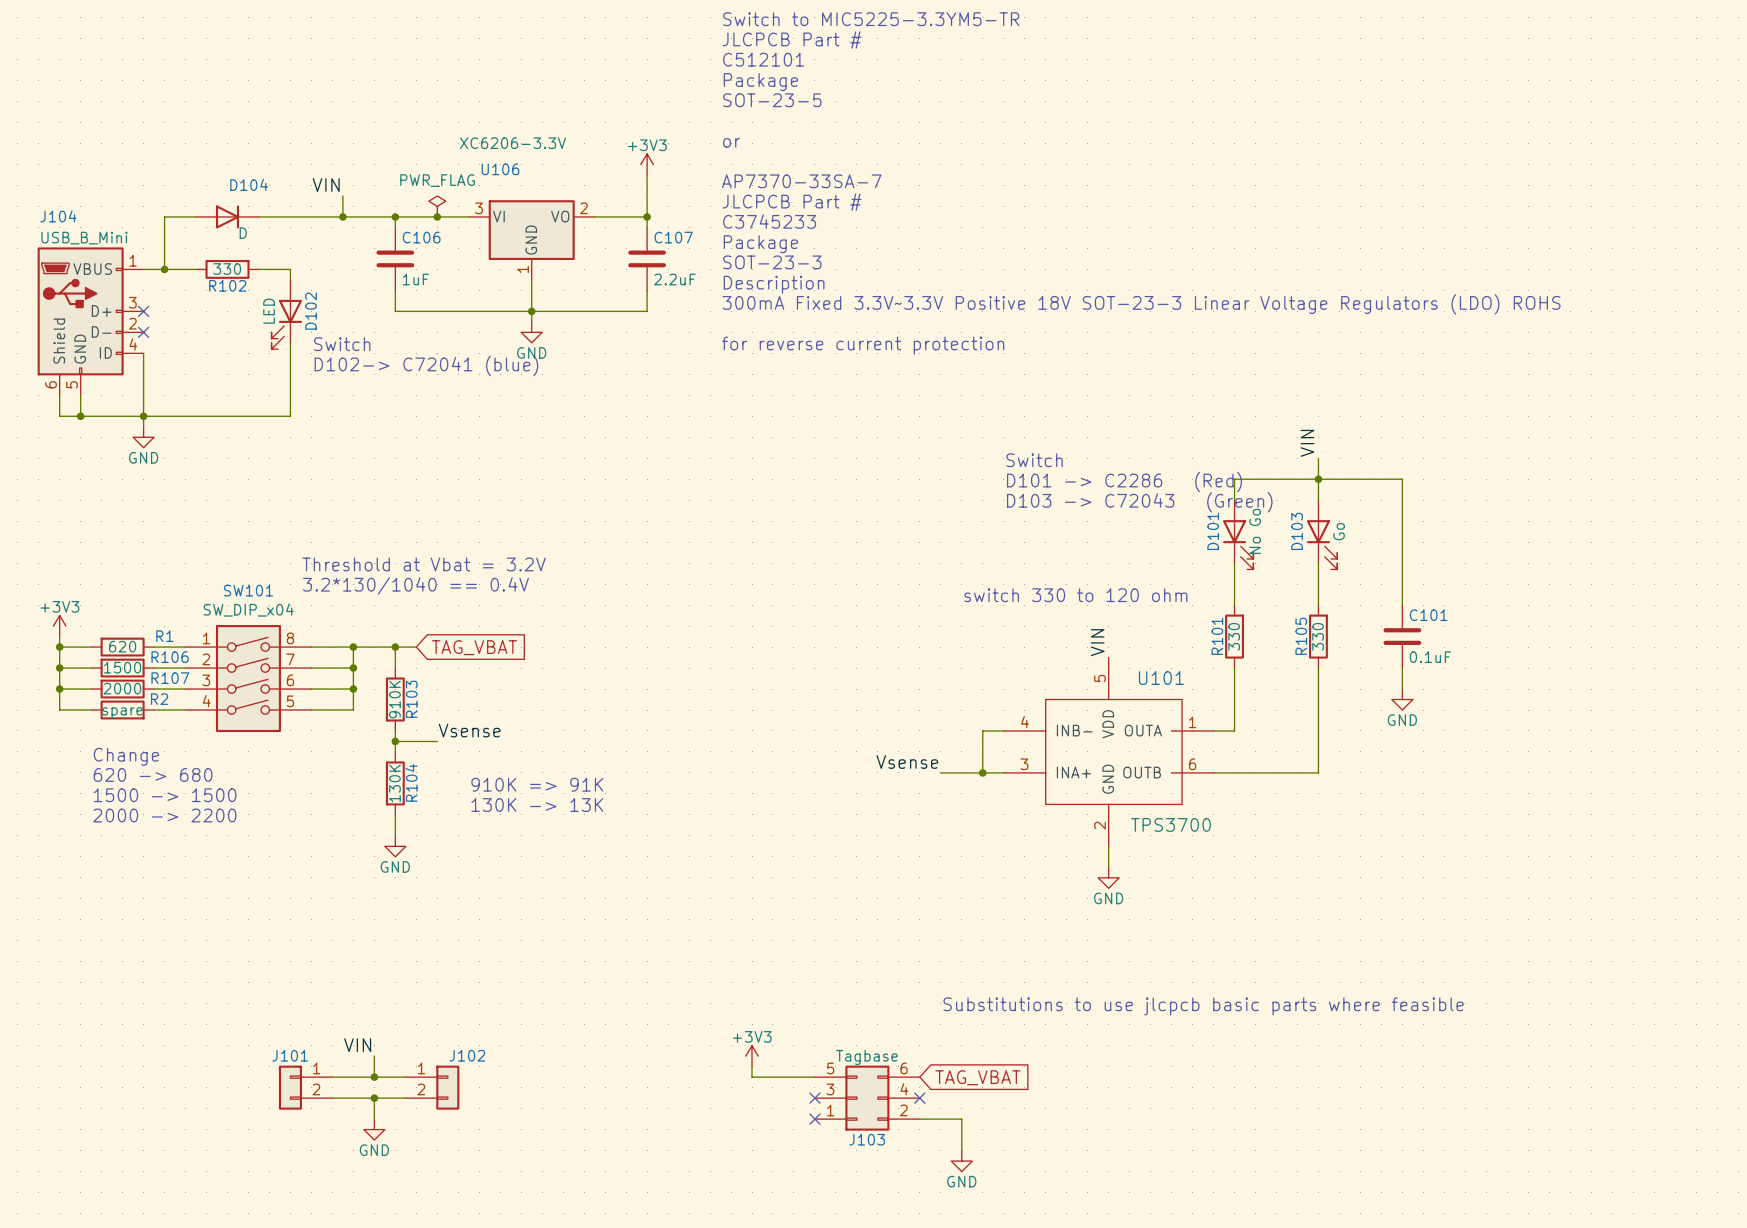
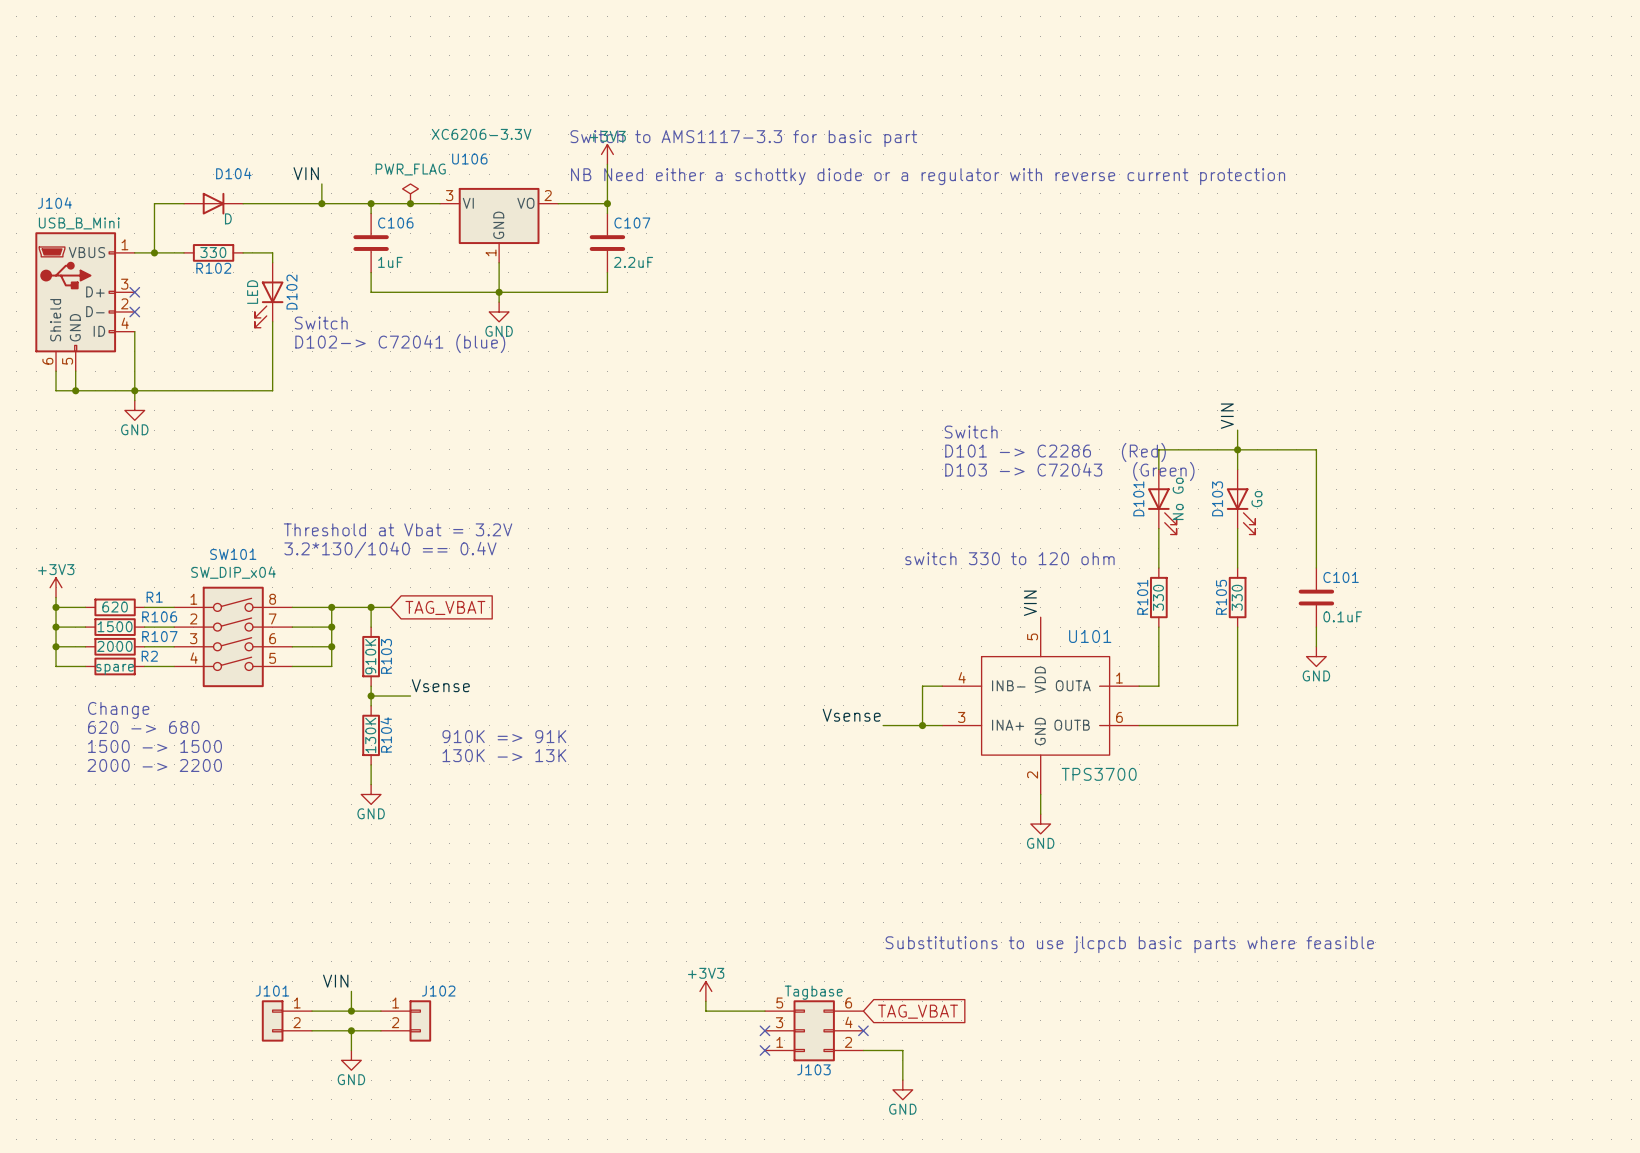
text: Switch to MIC5225-3.3YM5-TR (871, 19) -> none
text: JLCPCB Part # (792, 40) -> none
text: C512101 (763, 59) -> none
text: Package (760, 82) -> none
text: SOT-23-5 (772, 100) -> none
text: or (731, 142) -> none
text: none -> Switch to AMS1117-3.3 for basic part (743, 138)
text: AP7370-33SA-7 (801, 181) -> none
text: none -> NB Need either a schottky diode or a regulator with reverse current protection (928, 176)
text: JLCPCB Part # (792, 202) -> none
text: C3745233 (769, 221) -> none
text: Package (760, 244) -> none
text: SOT-23-3 (772, 262) -> none
text: Description (774, 284) -> none
text: 300mA Fixed 3.3V~3.3V Positive 18V SOT-23-3 Linear Voltage Regulators (LDO) ROHS (1141, 304) -> none
text: for reverse current protection (863, 345) -> none

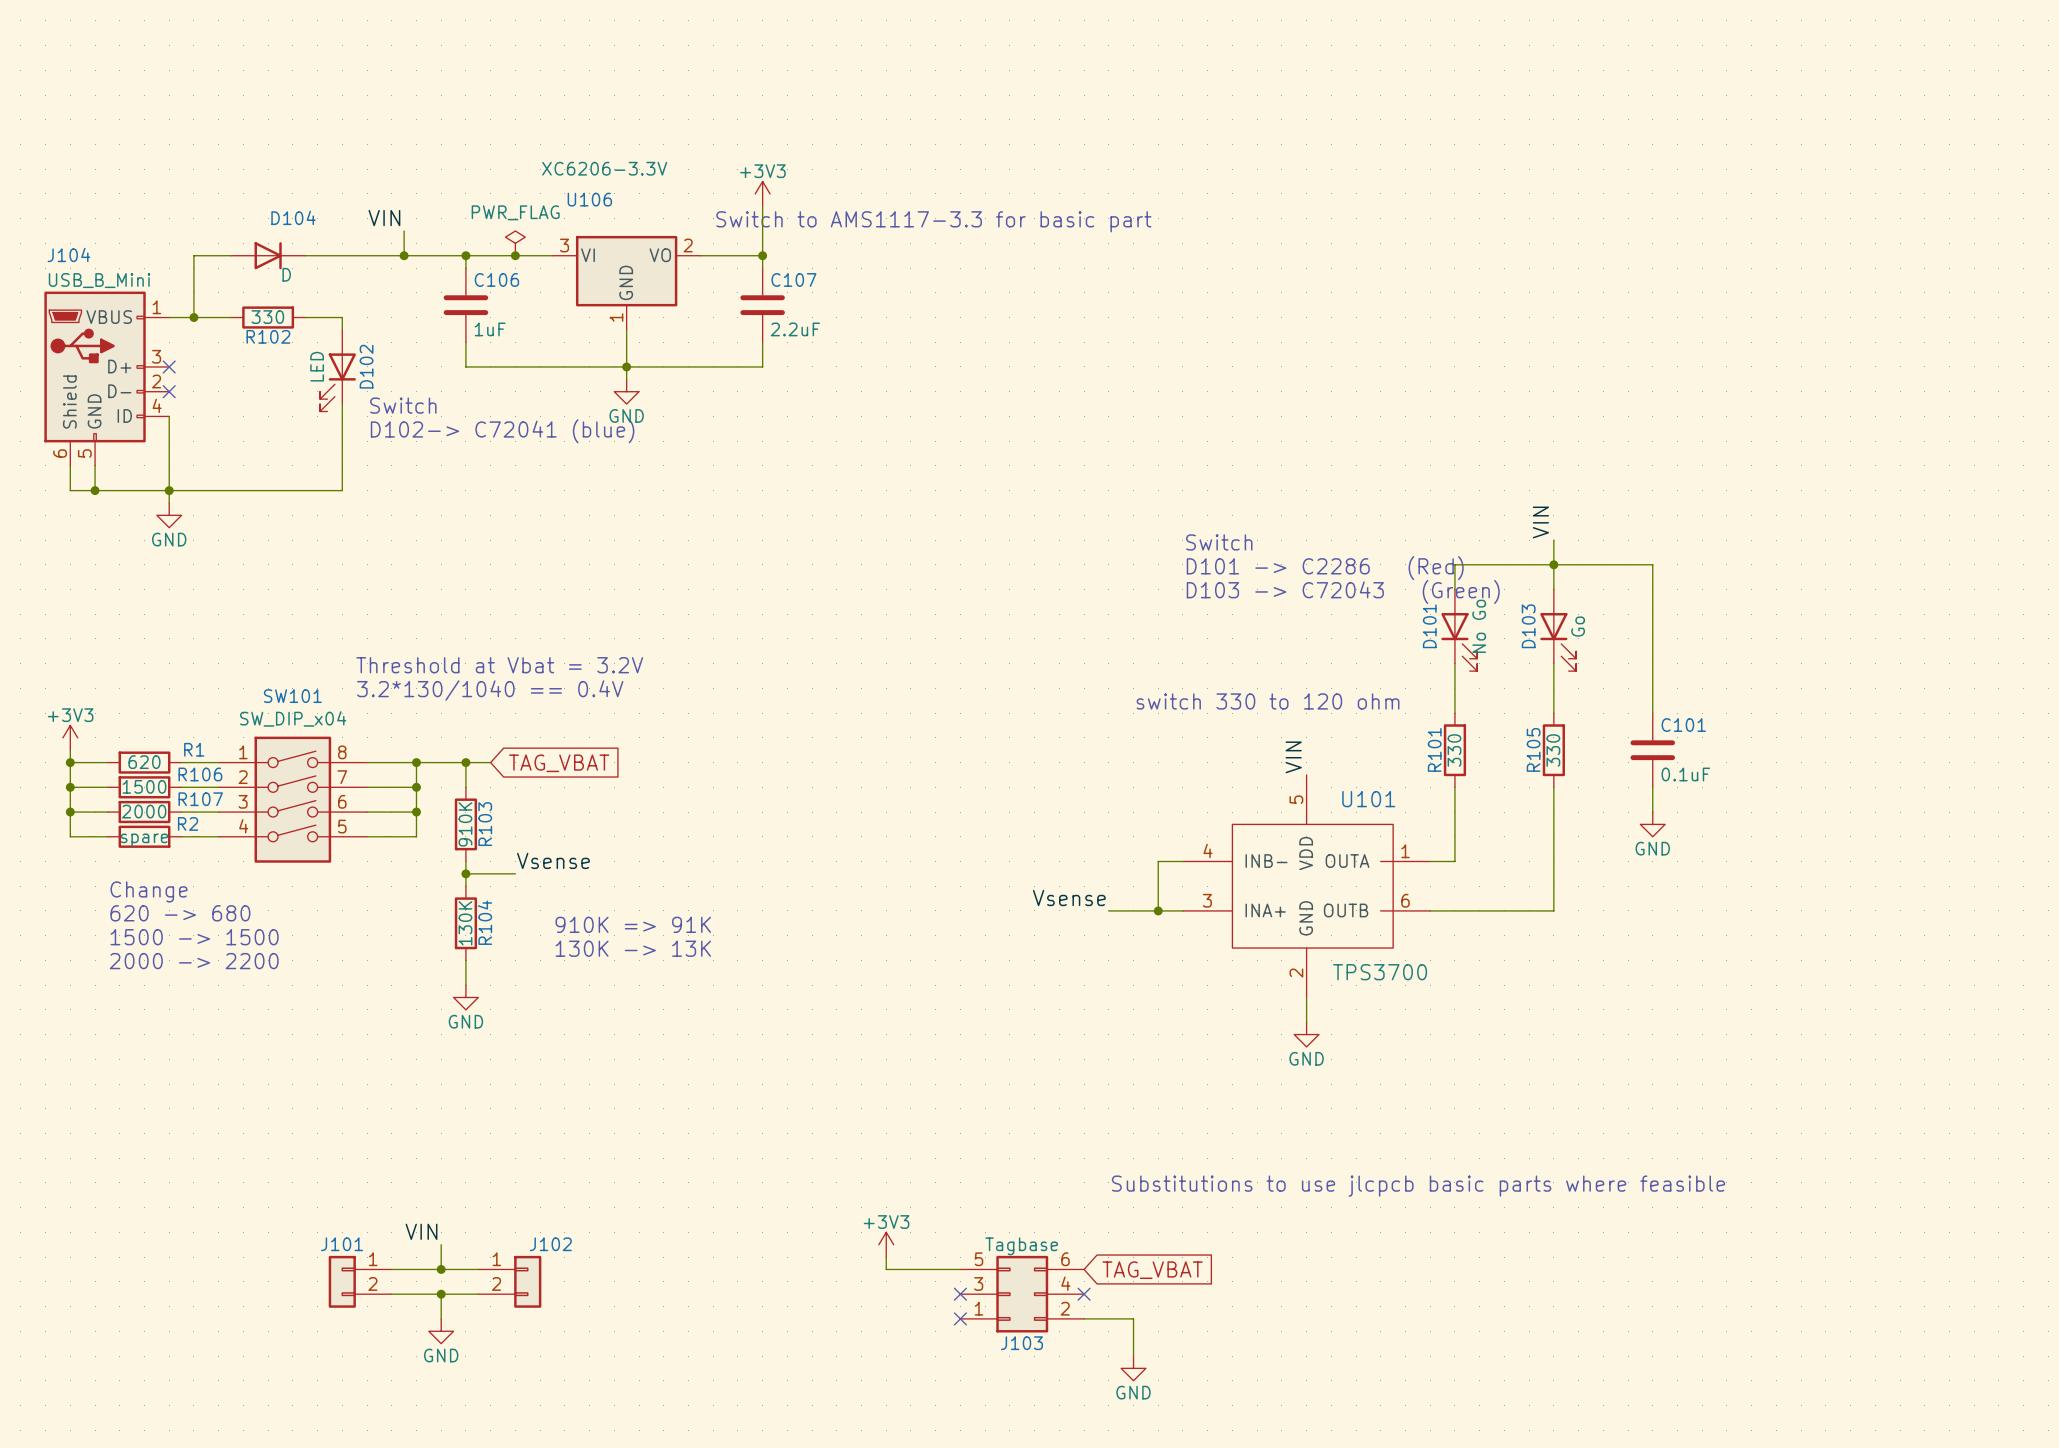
text: Switch to AMS1117-3.3 for basic part (743, 138) -> none
text: NB Need either a schottky diode or a regulator with reverse current protection (928, 176) -> Switch to AMS1117-3.3 for basic part (933, 221)

